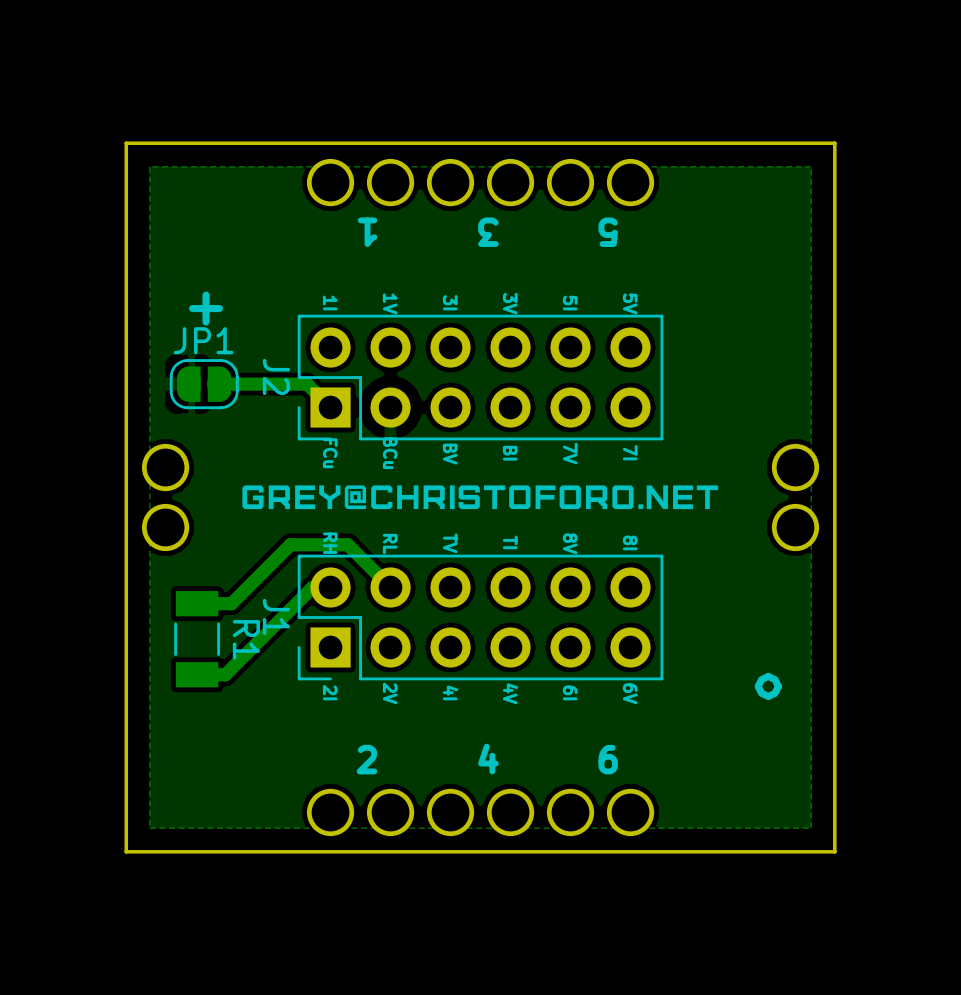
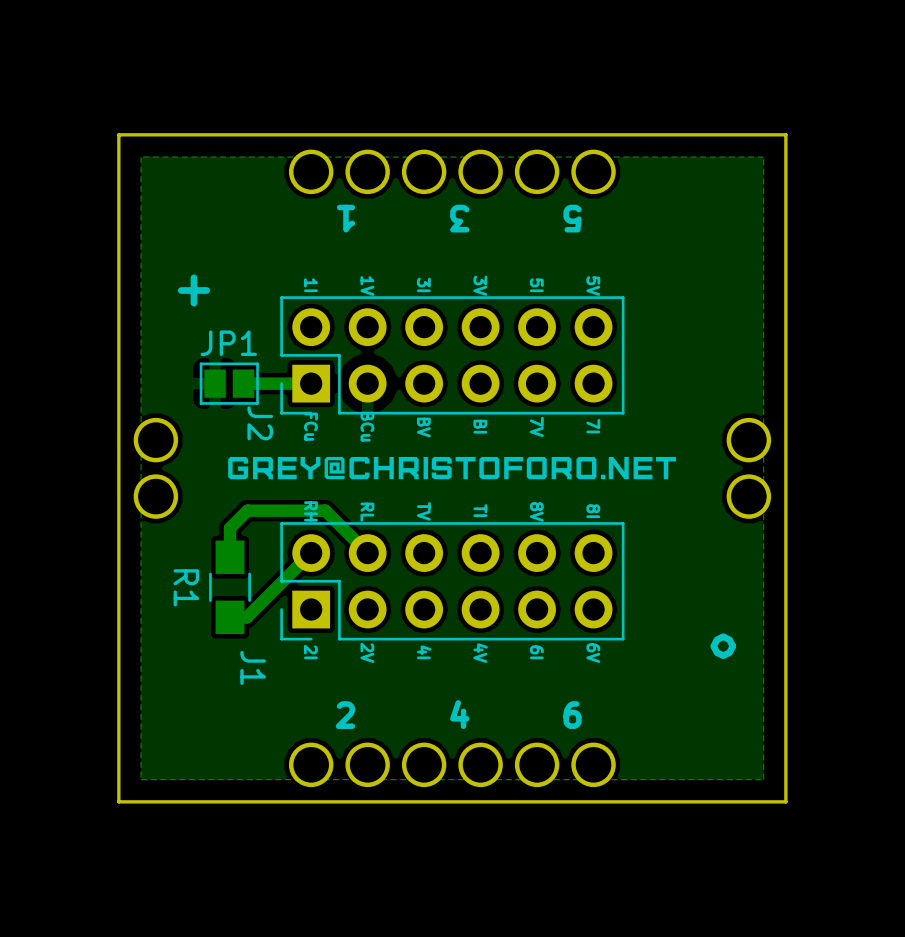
JP1 footprint: [169, 359, 239, 410] -> [199, 362, 259, 405]
J2 name position: J2 (276, 376) -> J2 (260, 423)
track: (213, 384) (307, 384) (330, 407) -> (243, 383) (311, 383)
track: (347, 544) (290, 544) (231, 603) (197, 603) -> (327, 512) (325, 510) (247, 510) (230, 528) (230, 557)
track: (330, 587) (312, 587) (225, 674) (197, 674) -> (311, 553) (246, 617) (230, 617)
R1 footprint: [174, 591, 221, 688] -> [209, 540, 251, 634]
J1 name position: J1 (276, 616) -> J1 (253, 667)
R1 name position: R1 (246, 639) -> R1 (186, 587)

